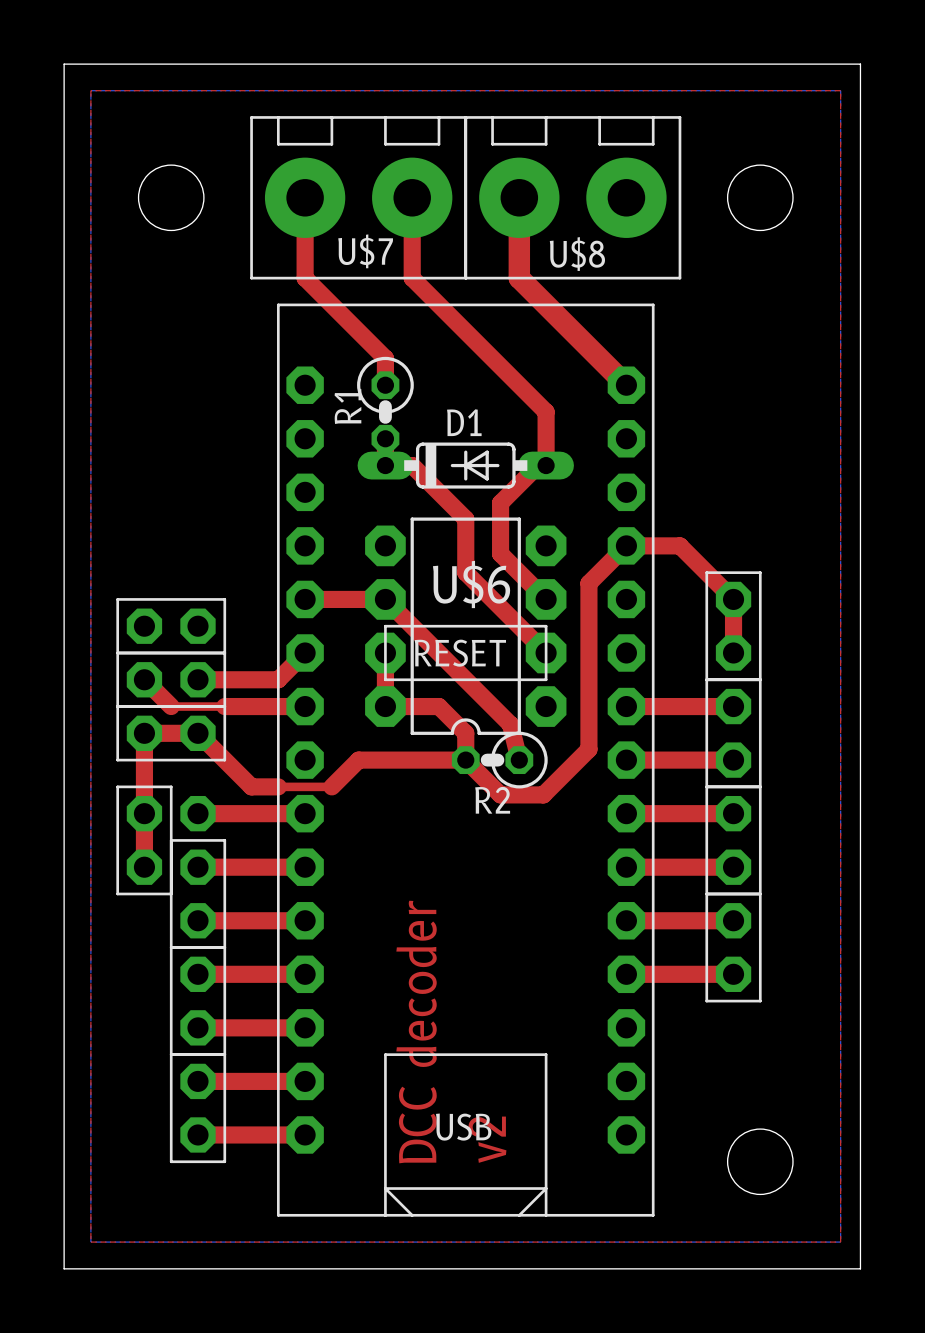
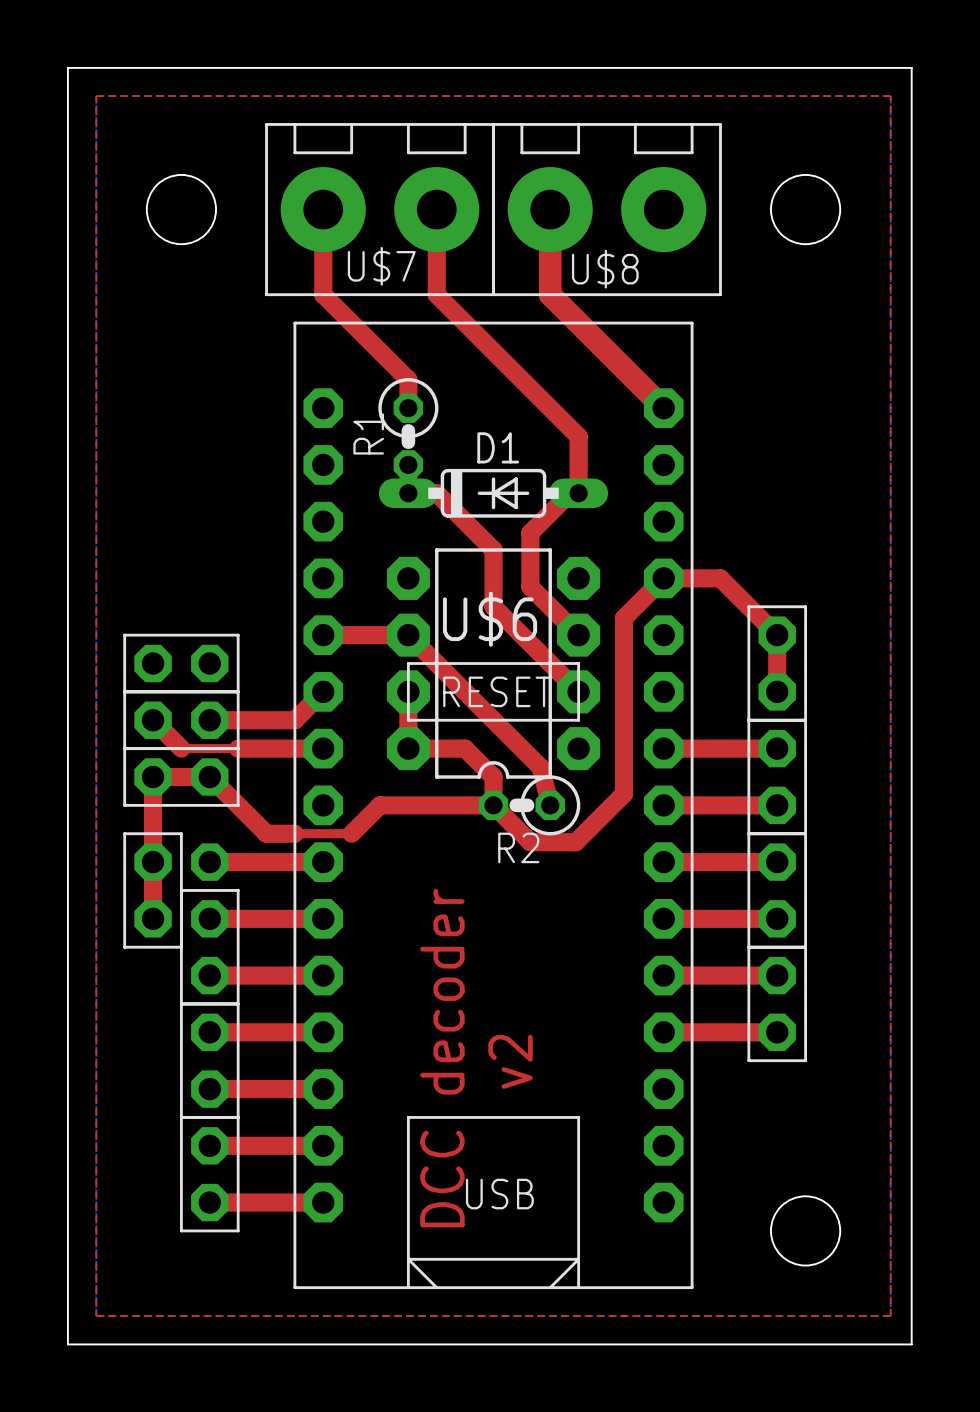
text position: v2 (487, 1139) -> v2 (510, 1061)

